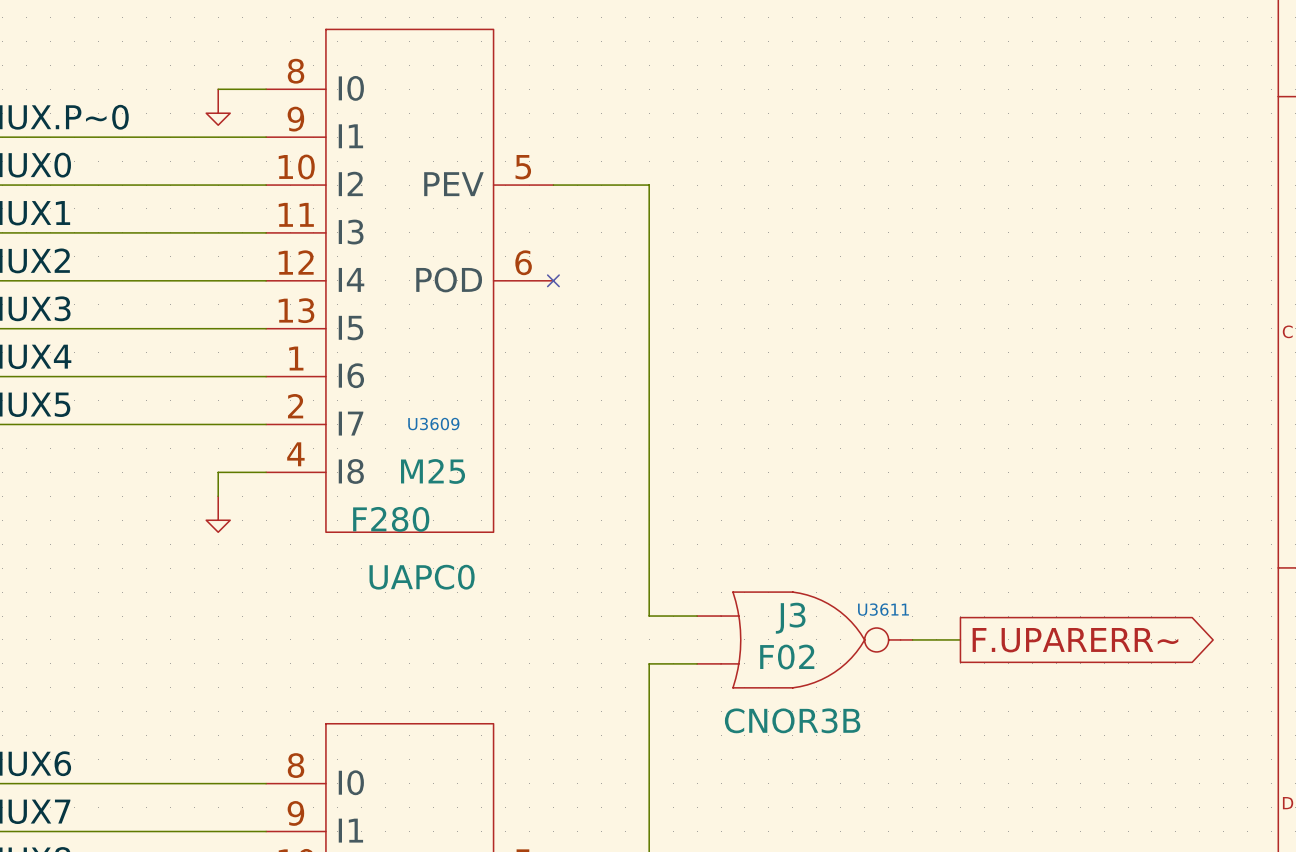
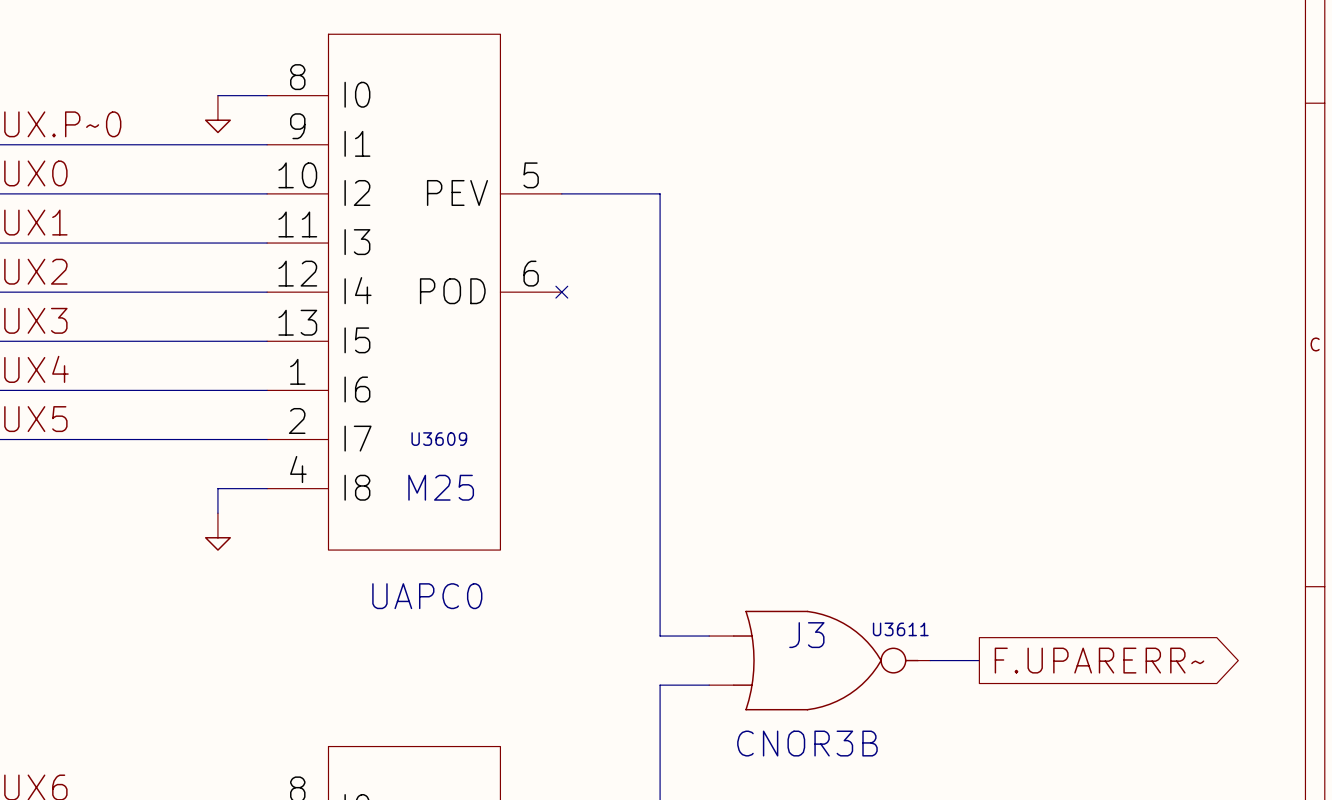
U3609 value: F280 (391, 519) -> none
U3611 value: F02 (787, 657) -> none

